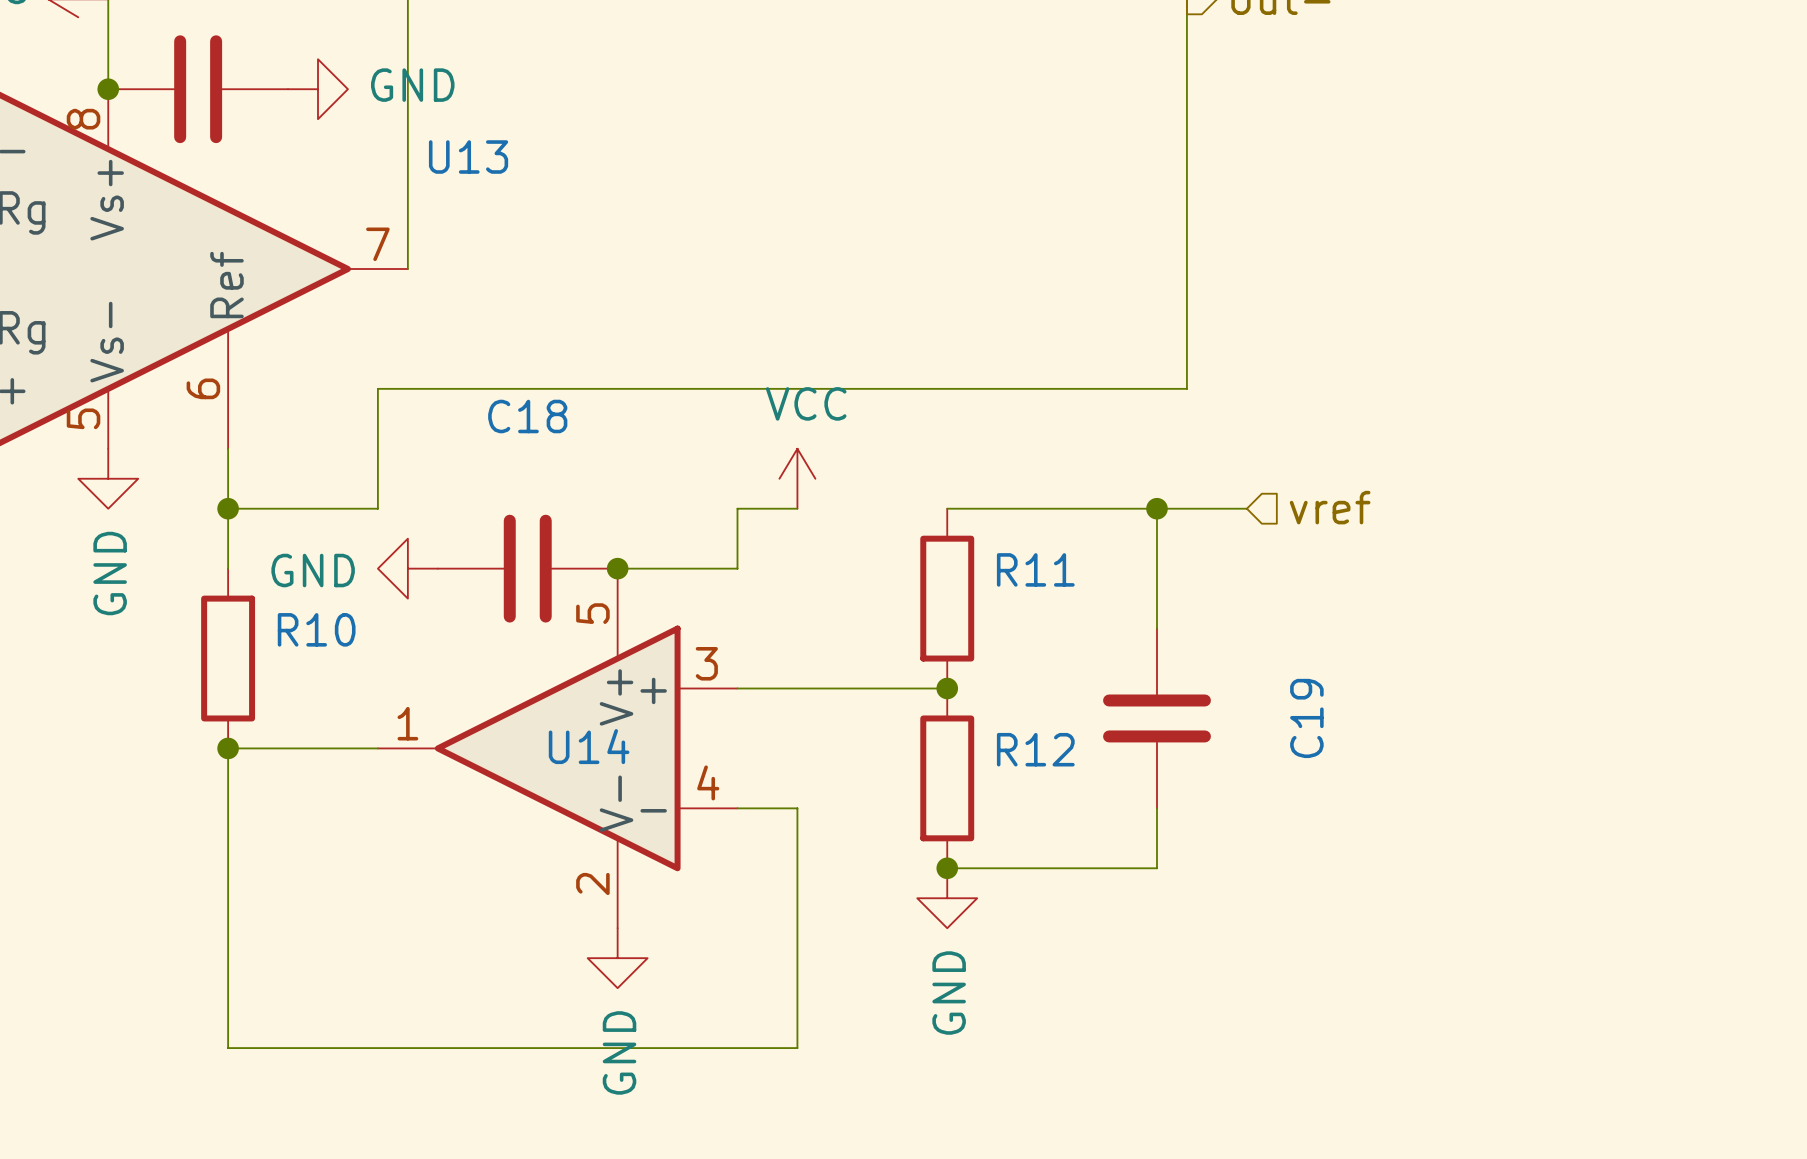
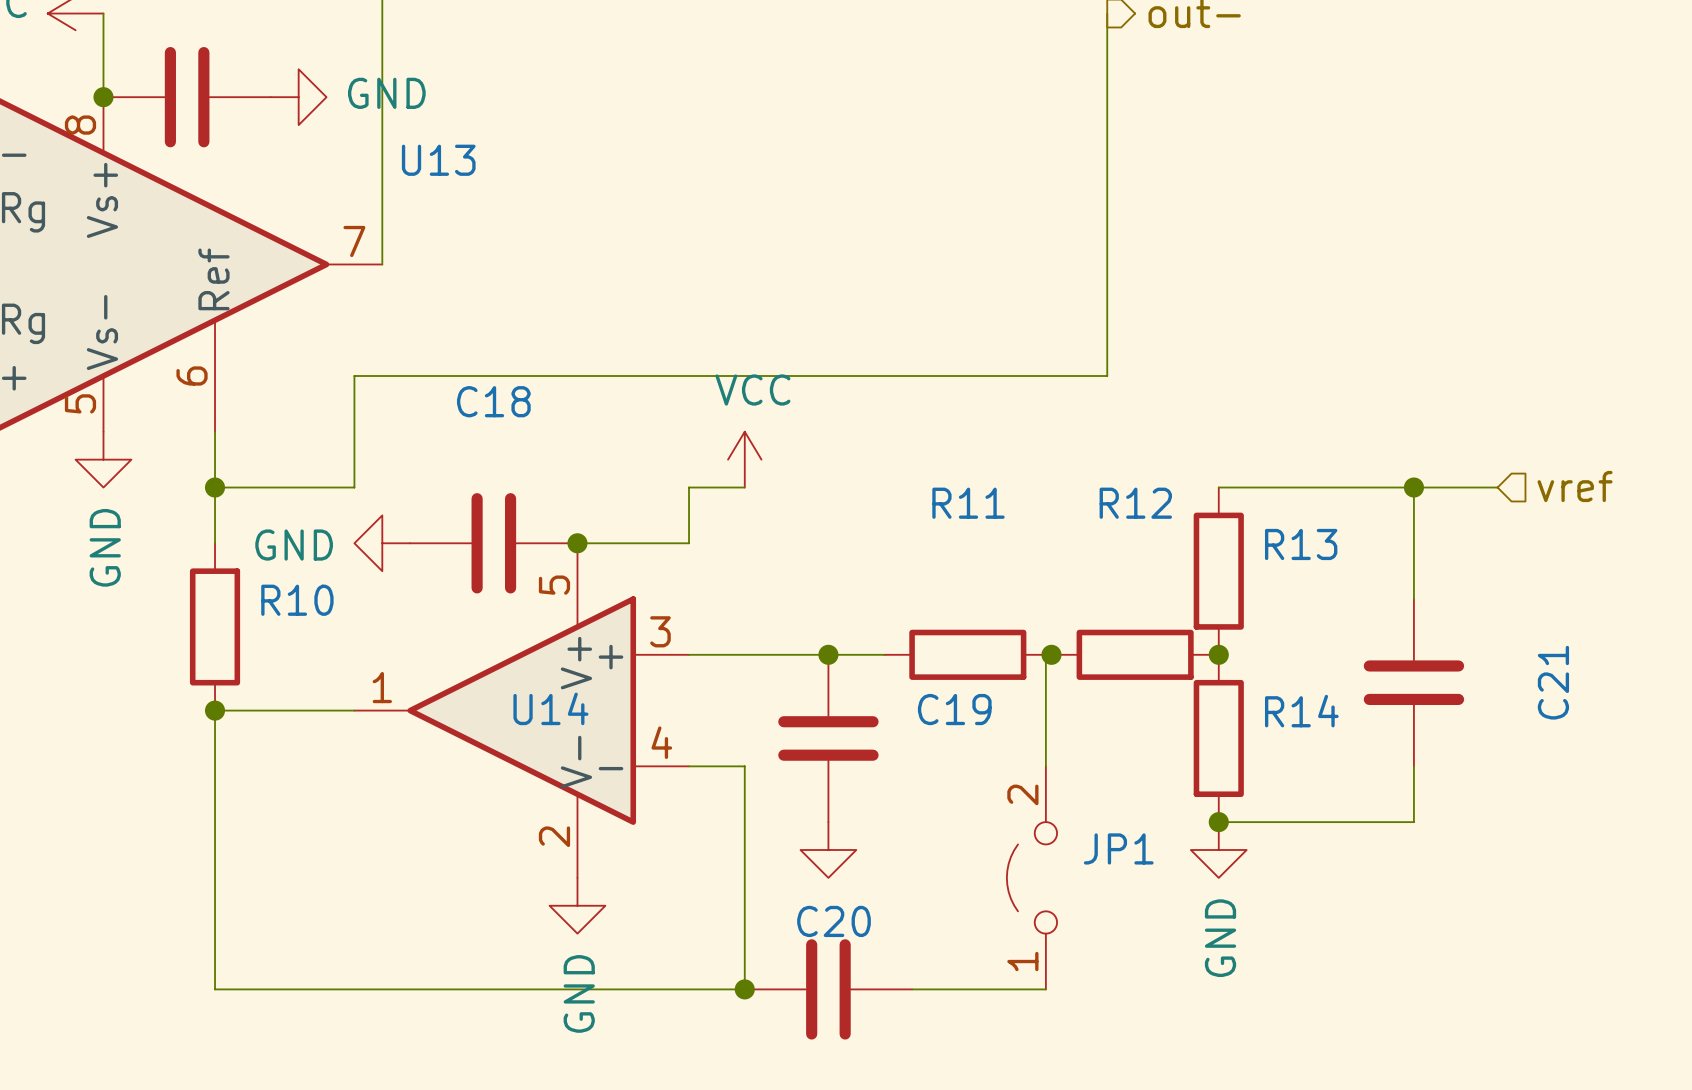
hierarchical label position: vref (1330, 507) -> vref (1575, 486)
wire: (947, 508) (1246, 508) -> (1218, 487) (1497, 487)
wire: (1156, 508) (1156, 628) -> (1413, 487) (1413, 599)
junction: (1156, 508) -> none
junction: none -> (1413, 487)
R11 name position: R11 (1035, 569) -> R11 (968, 503)
R11 rotation: 0° (947, 598) -> 90° clockwise (967, 654)
R11 position: (947, 598) -> (967, 654)
R13: none -> (1218, 571)
junction position: (947, 688) -> (828, 654)
wire: none -> (1051, 654) (1045, 654) (1045, 766)
junction: none -> (1051, 654)
junction: none -> (1218, 654)
C19 position: (1156, 718) -> (828, 738)
C19 name rotation: 0° (1306, 718) -> 90° clockwise (954, 709)
C21: none -> (1413, 682)
R12 name position: R12 (1035, 749) -> R12 (1135, 503)
R12 rotation: 0° (947, 778) -> 90° clockwise (1135, 654)
R12 position: (947, 778) -> (1135, 654)
R14: none -> (1218, 738)
wire: (1156, 808) (1156, 868) (947, 868) -> (1413, 766) (1413, 822) (1218, 822)
junction: (947, 868) -> none
junction: none -> (1218, 822)
power symbol: none -> (828, 849)
power symbol position: GND (947, 898) -> GND (1218, 849)
JP1: none -> (1031, 877)
junction: none -> (744, 989)
C20: none -> (828, 989)
wire: none -> (912, 989) (1045, 989)

